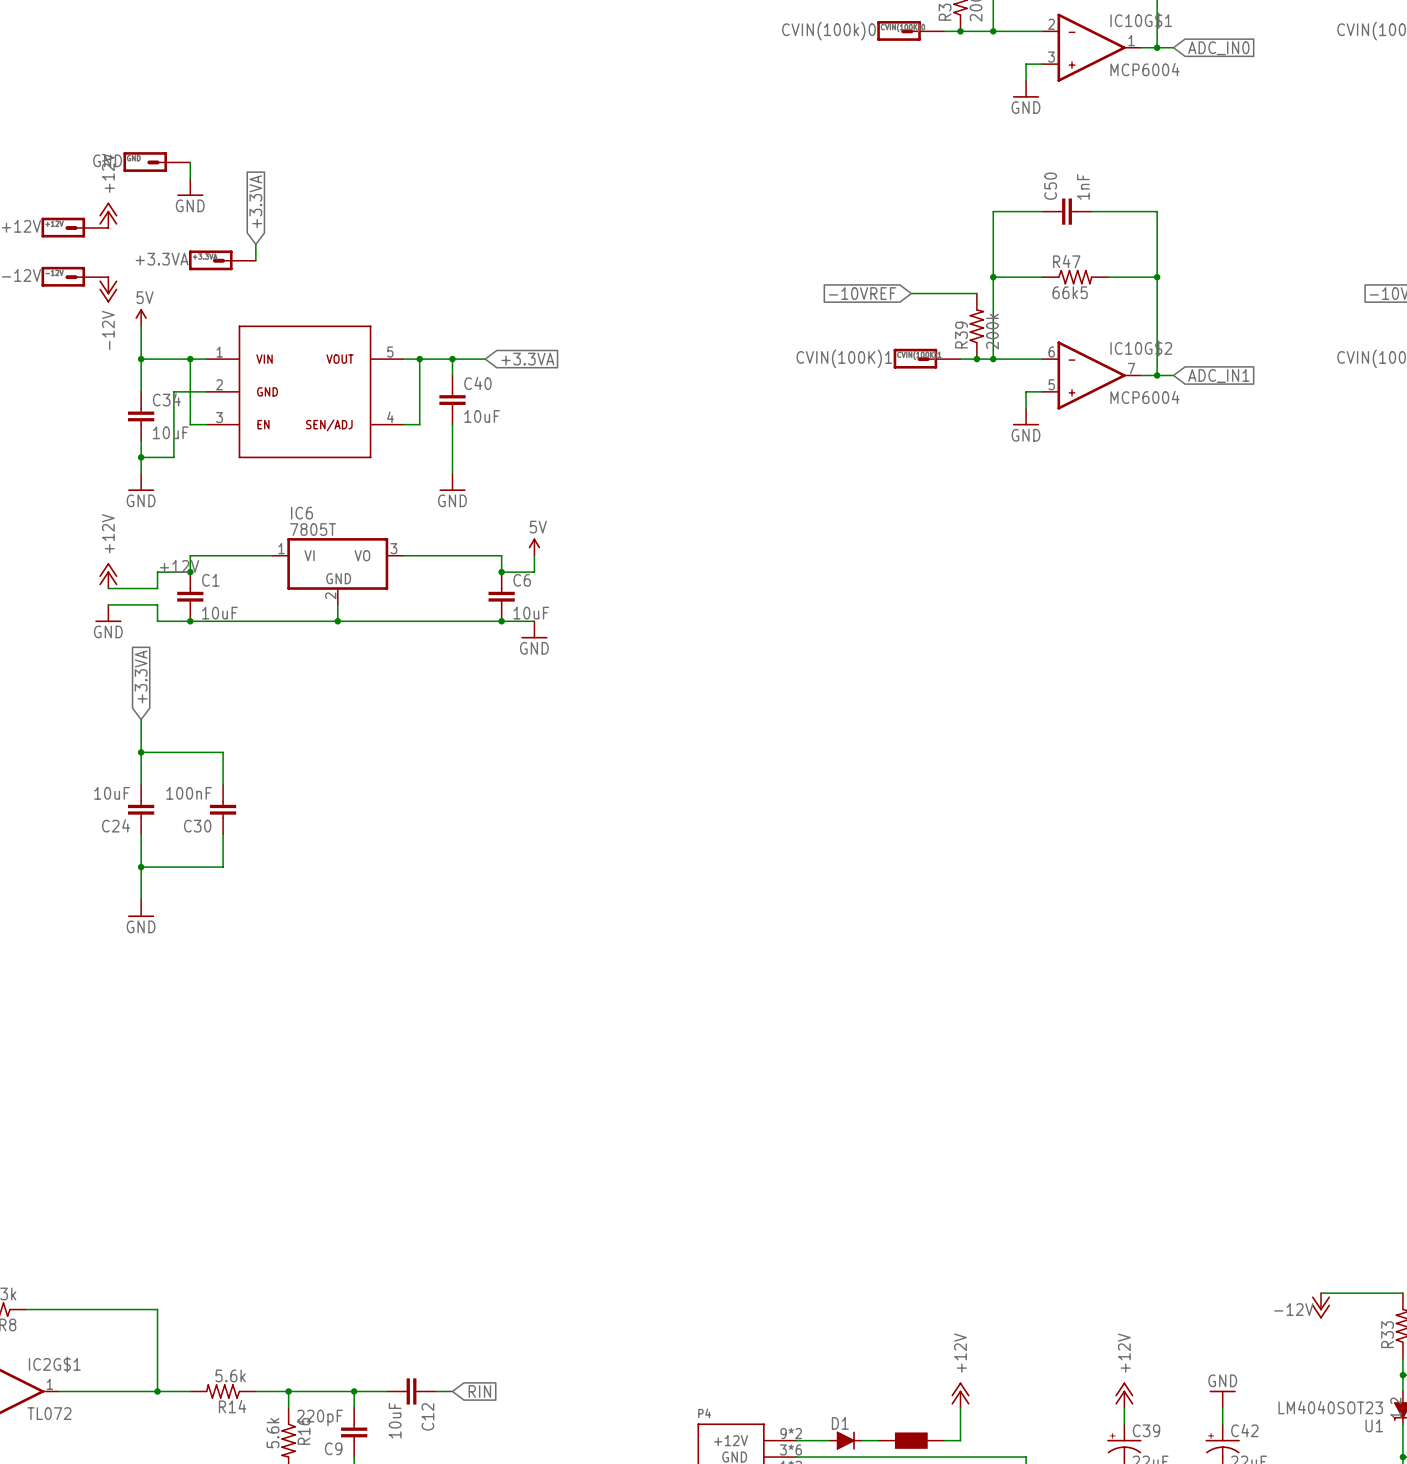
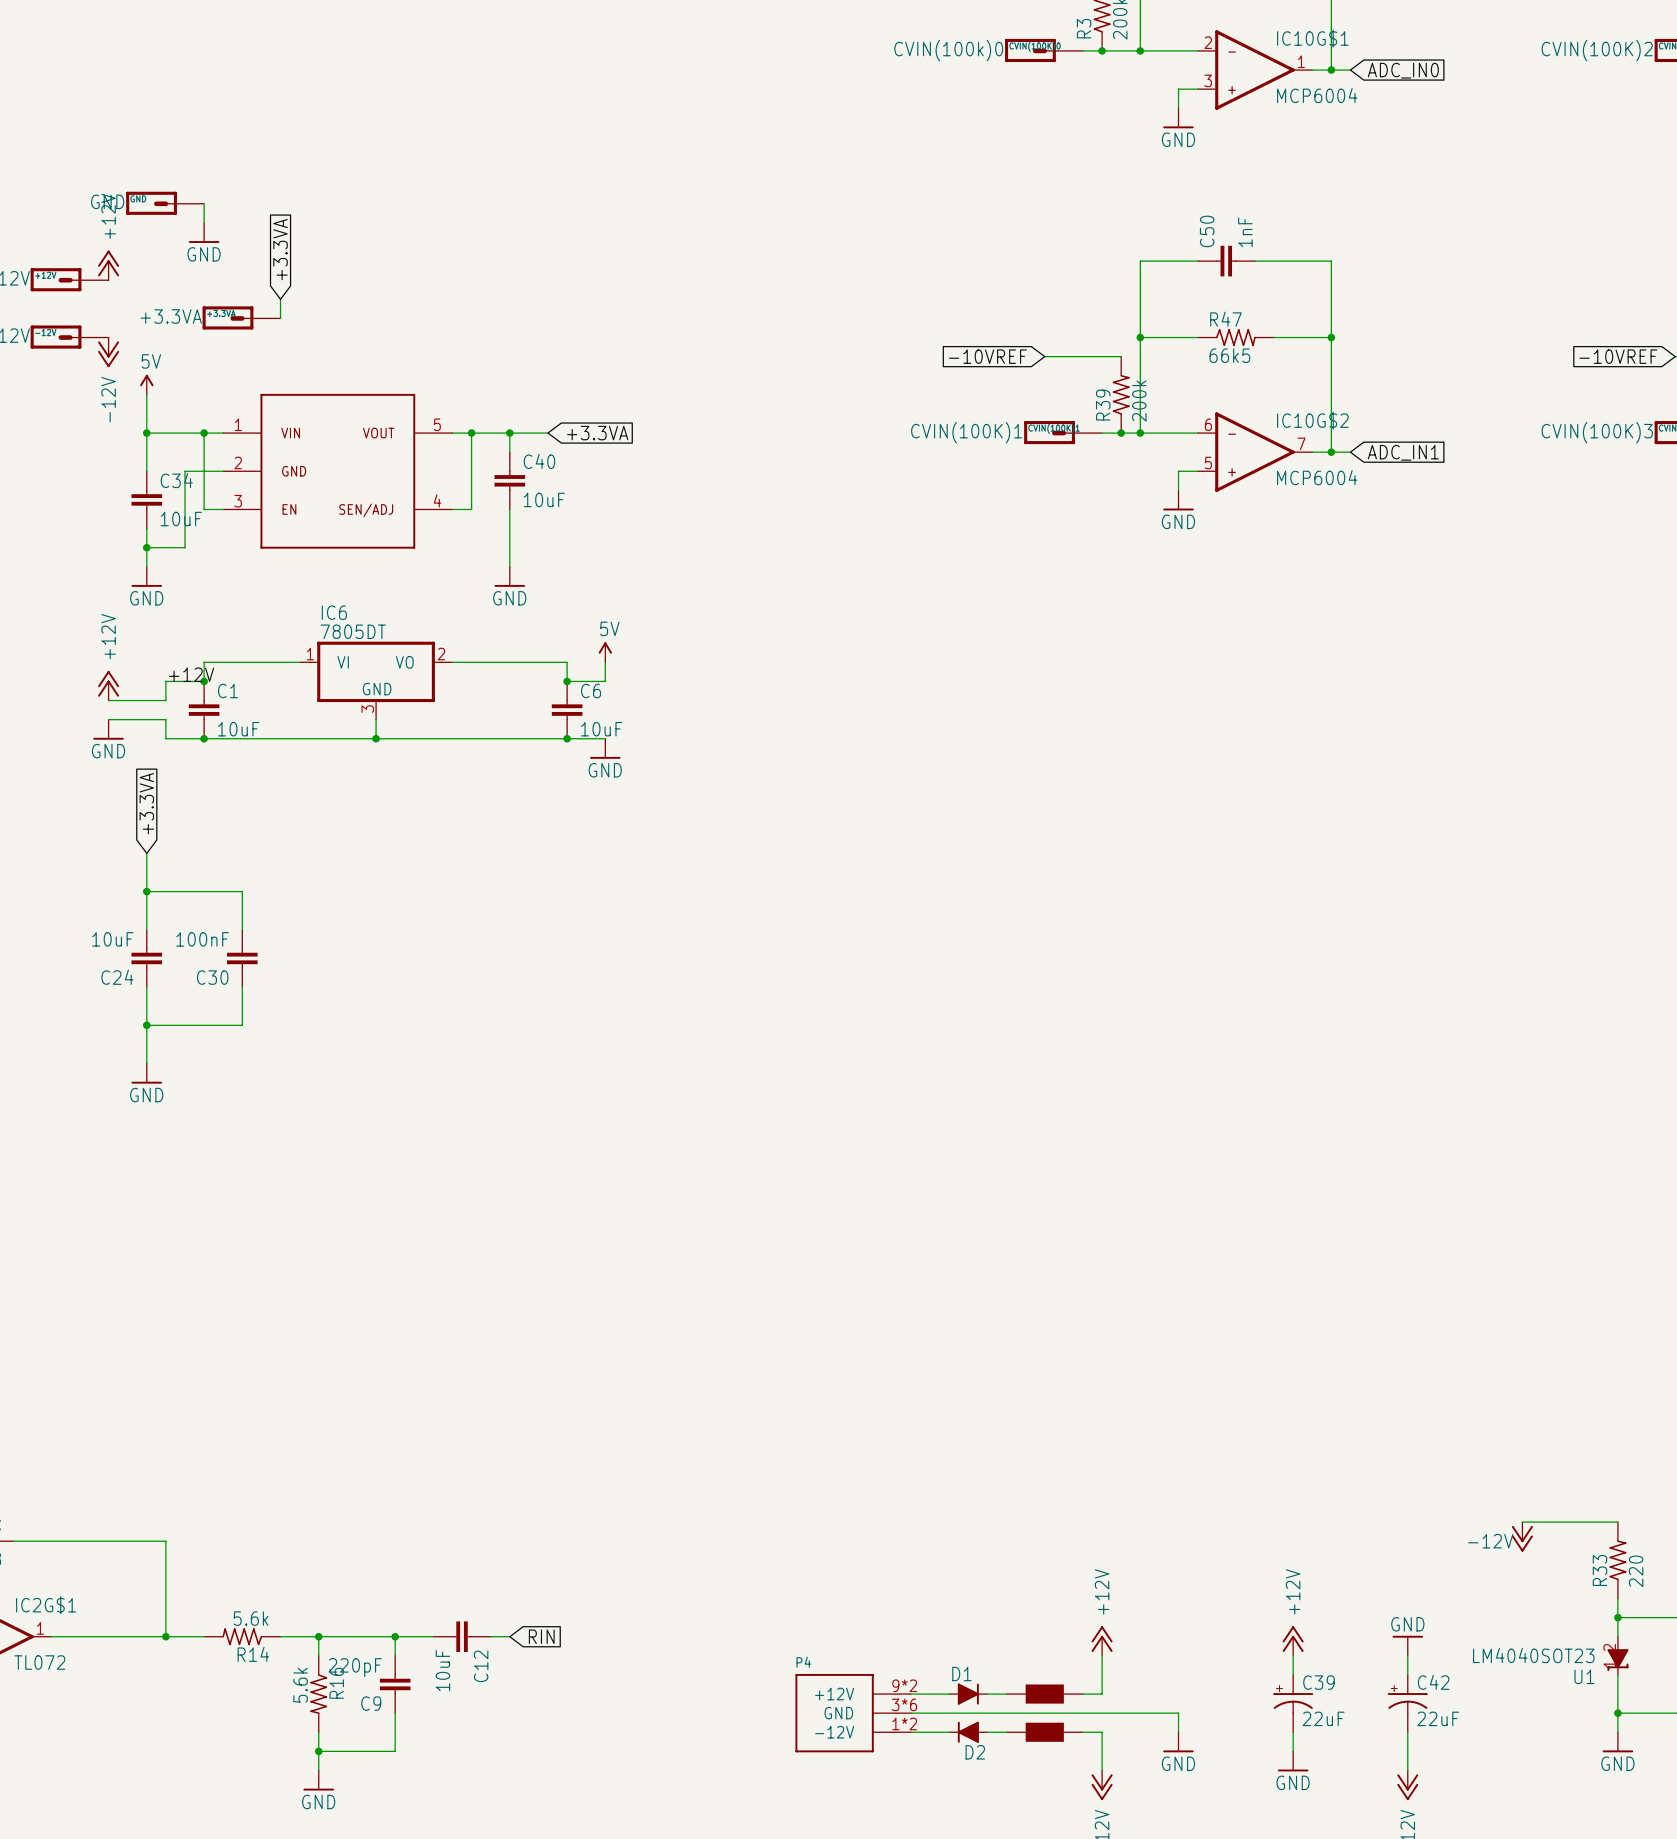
IC6 value: 7805T (313, 529) -> 7805DT (353, 631)
IC6 pin number: 3 (393, 548) -> 2 (441, 654)
IC6 pin number: 2 (330, 595) -> 3 (367, 709)

